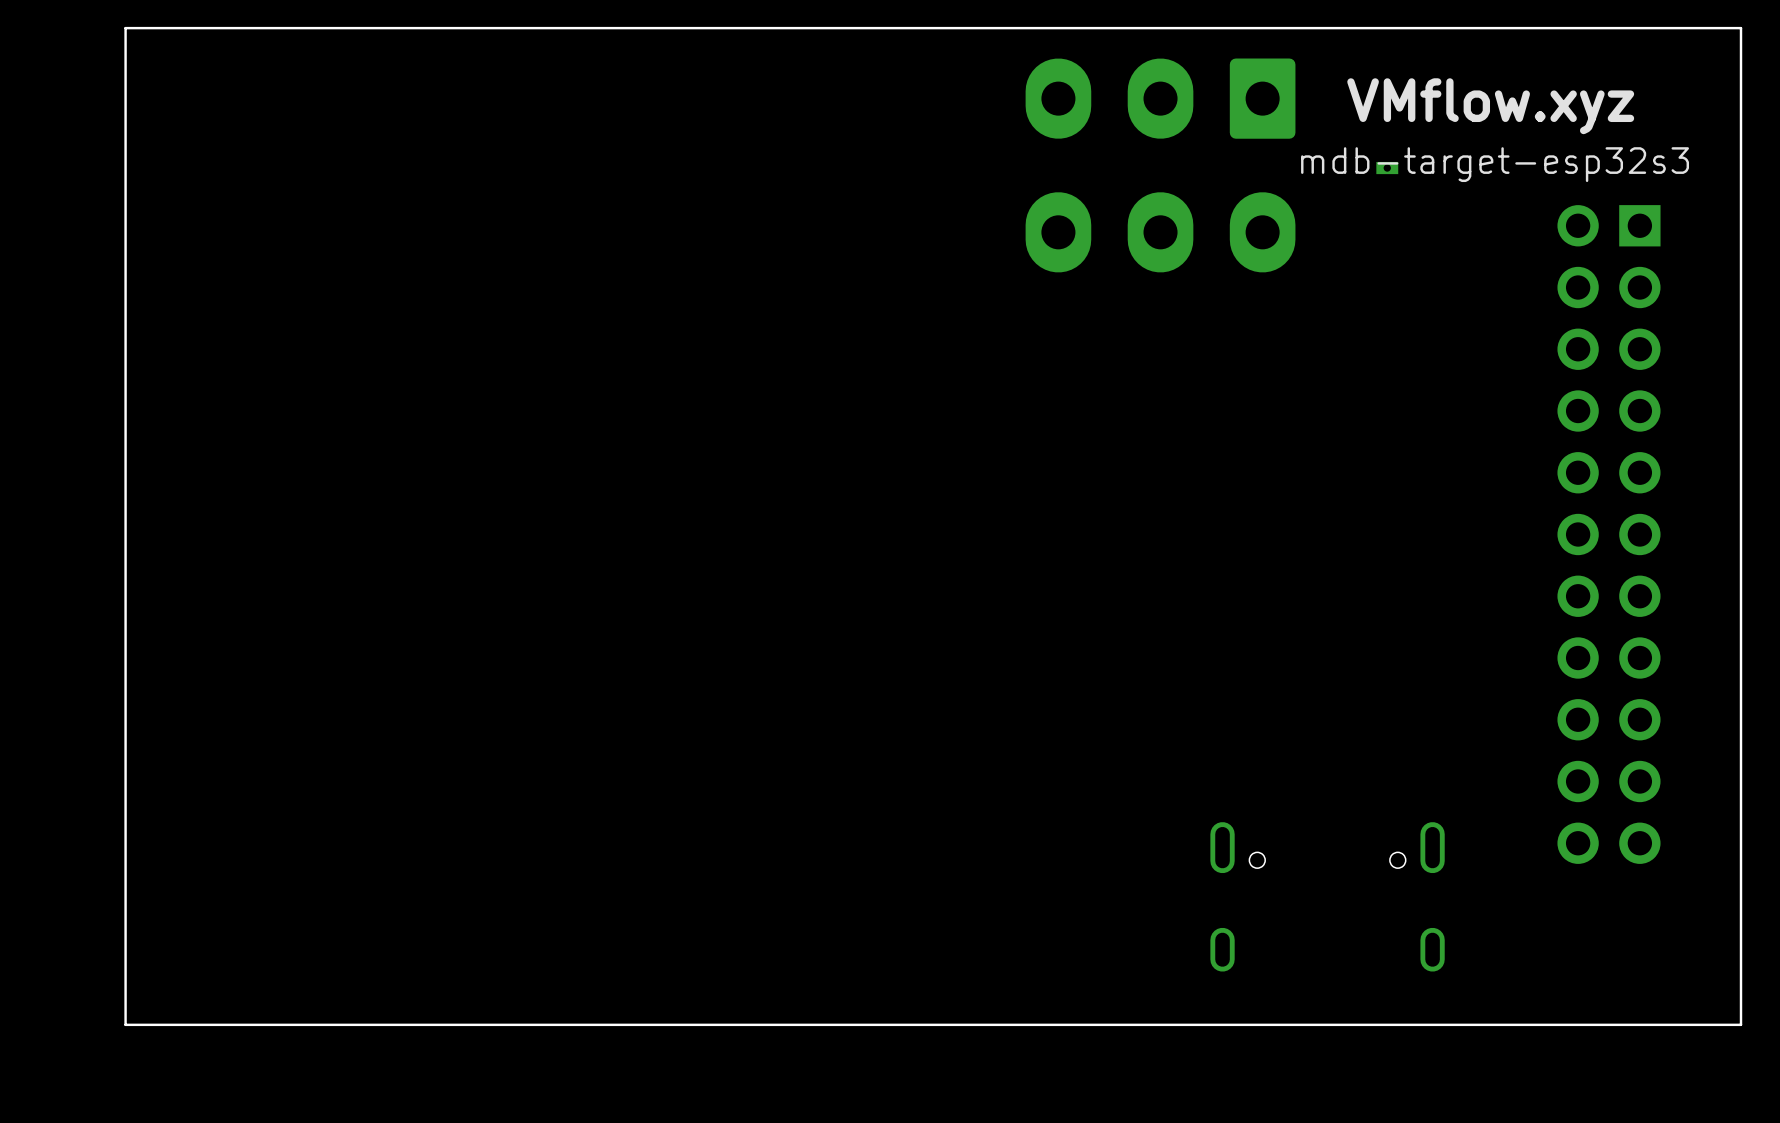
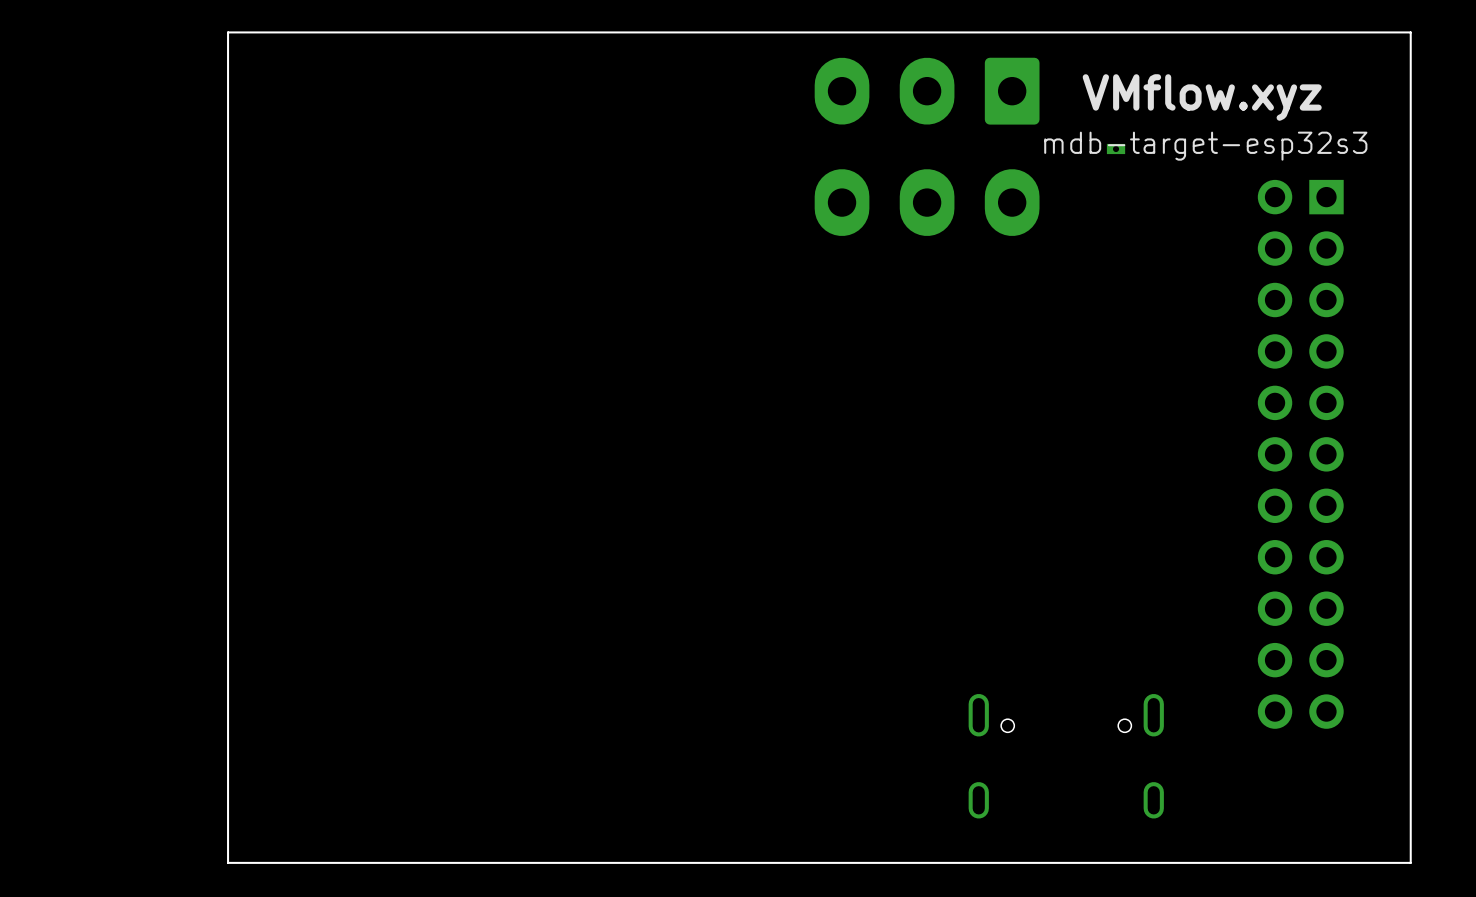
board edge: (321, 28) (125, 28) (125, 1024) (321, 1024) -> (228, 32) (228, 862)

